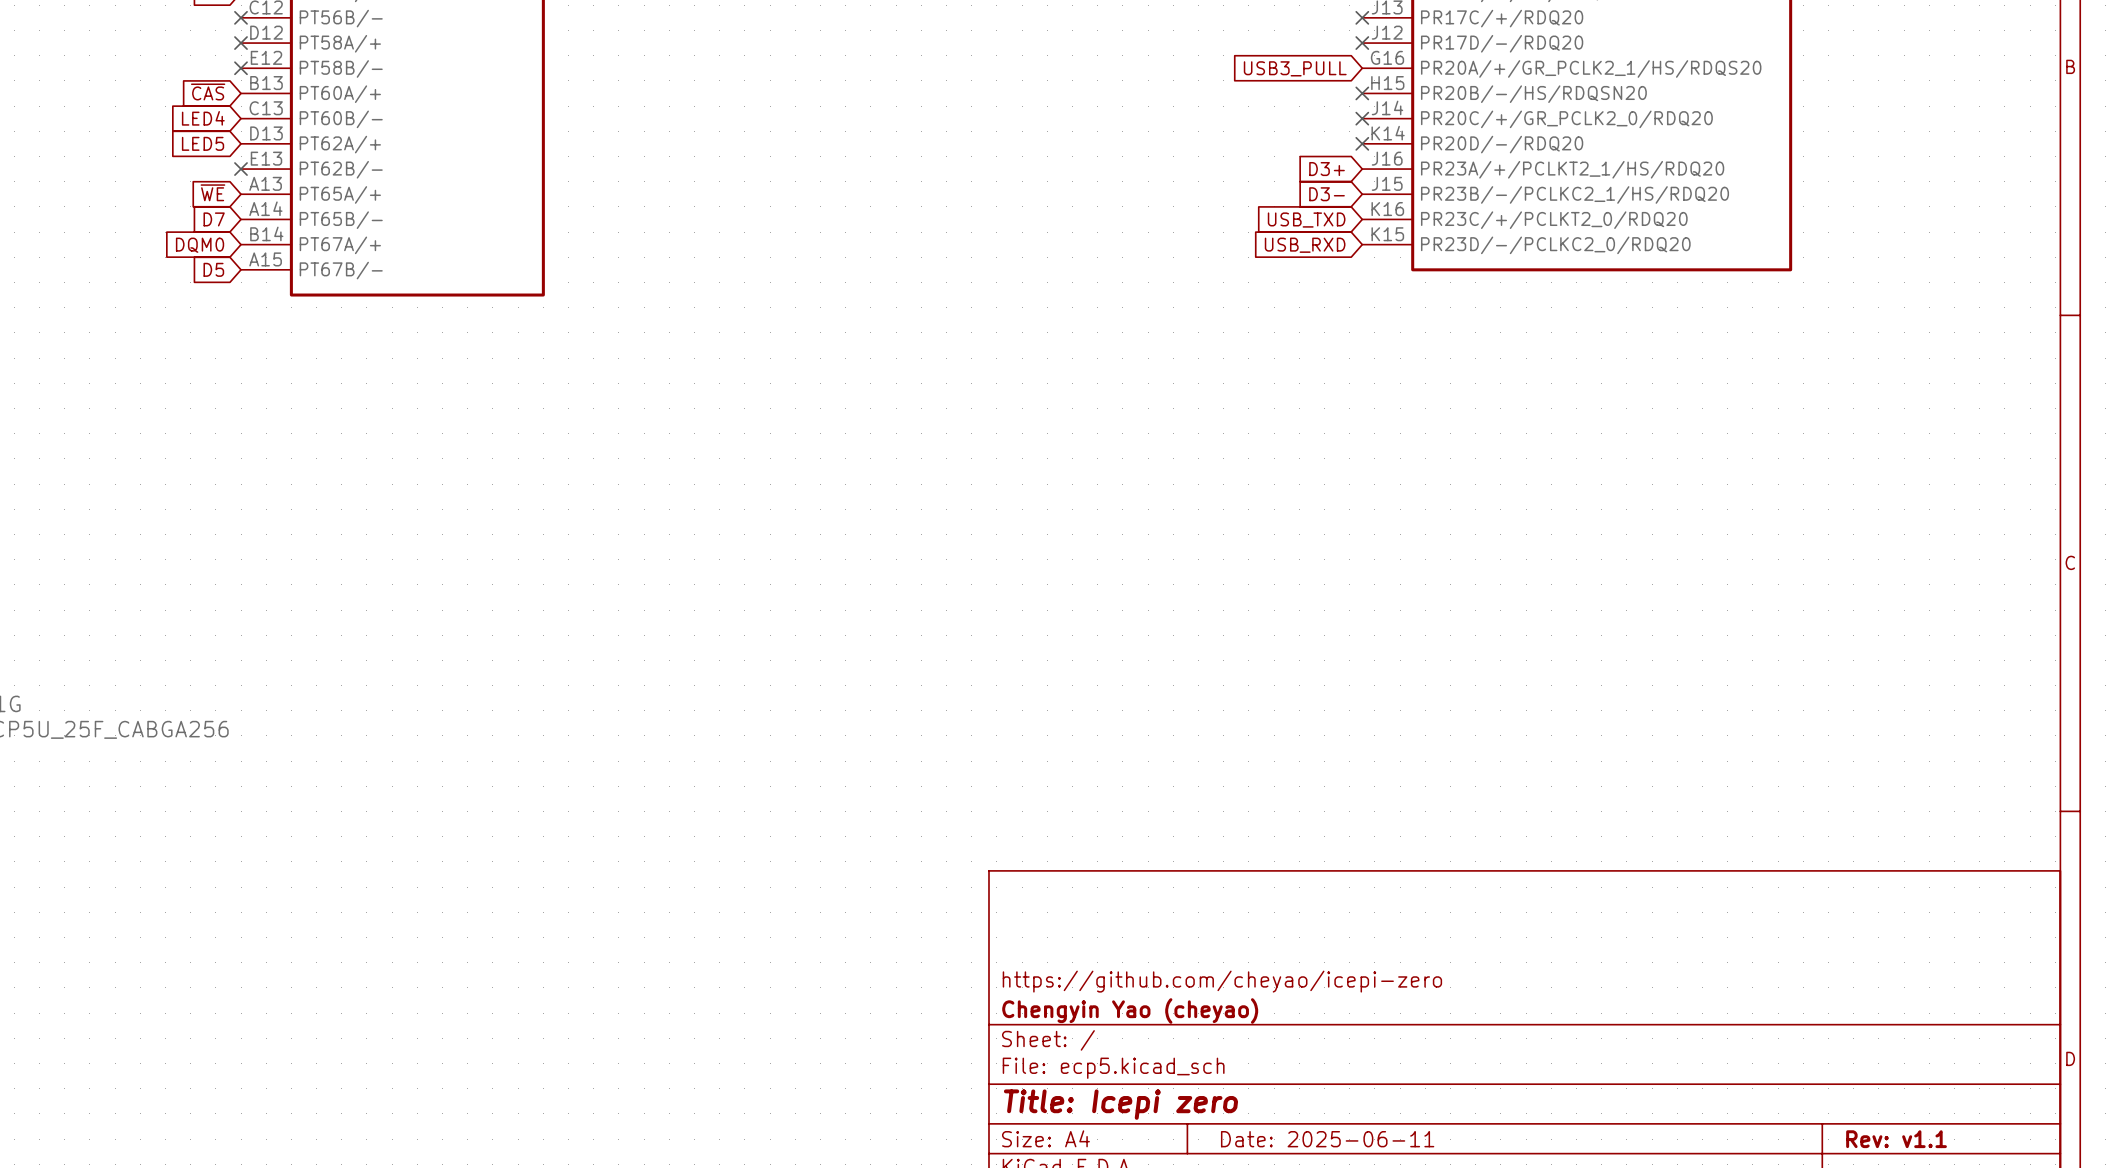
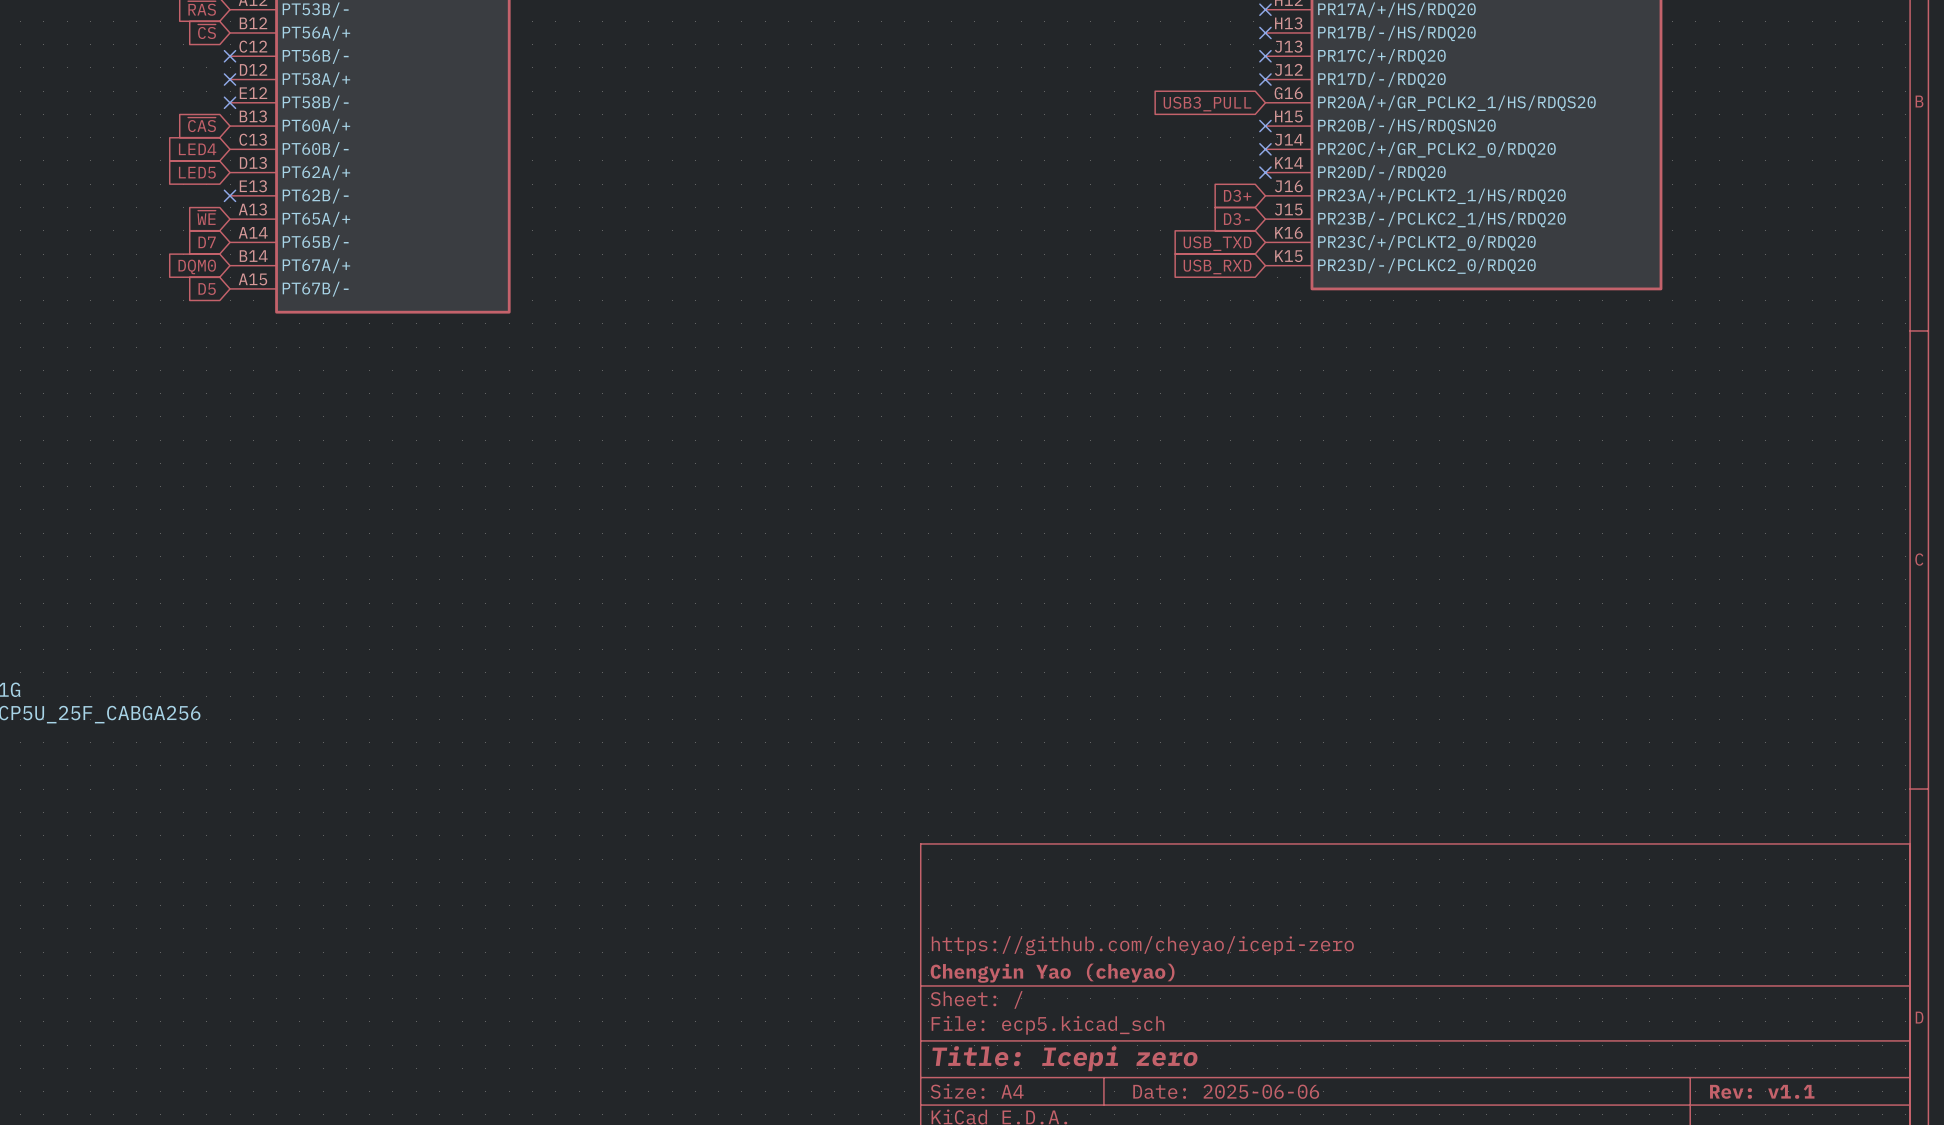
title block: Date: 2025-06-11 (1327, 1139) -> Date: 2025-06-06 (1226, 1091)

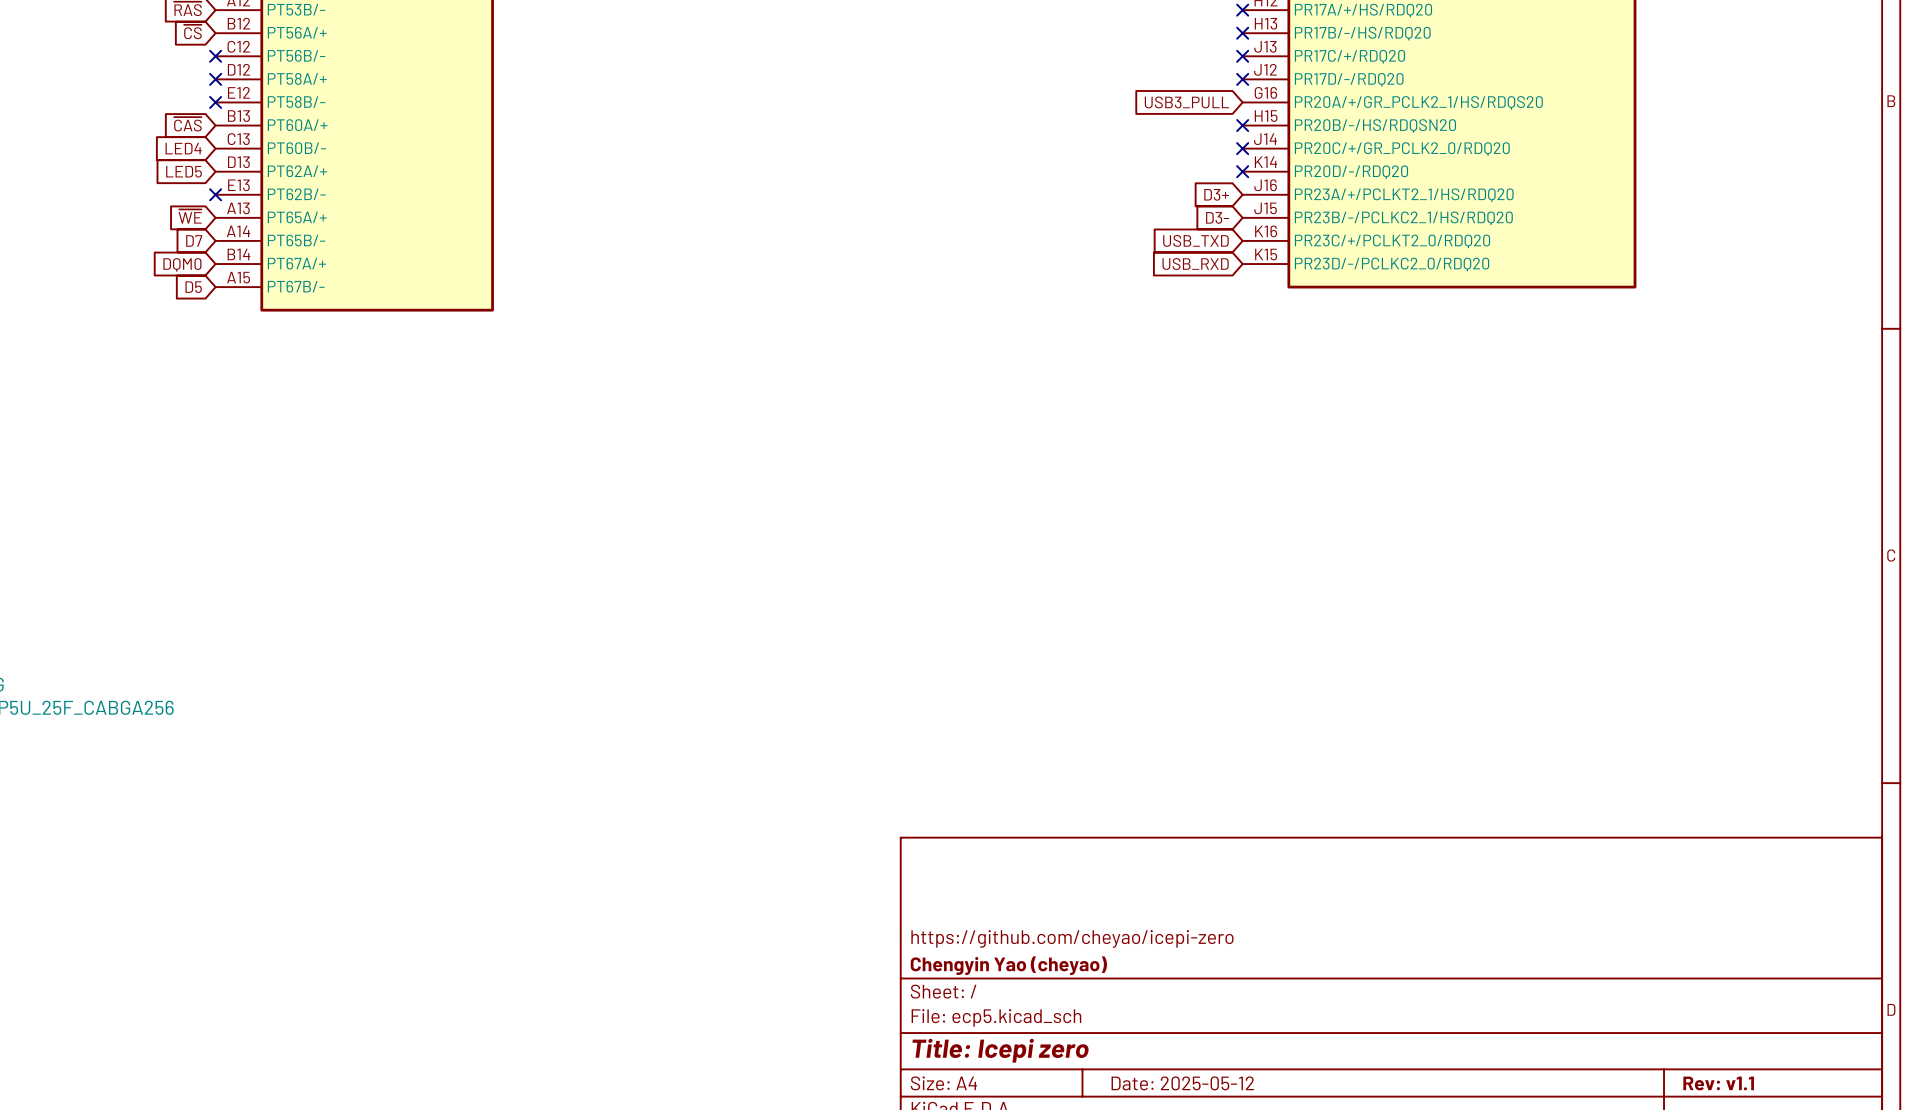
title block: Date: 2025-06-06 (1226, 1091) -> Date: 2025-05-12 (1182, 1083)

